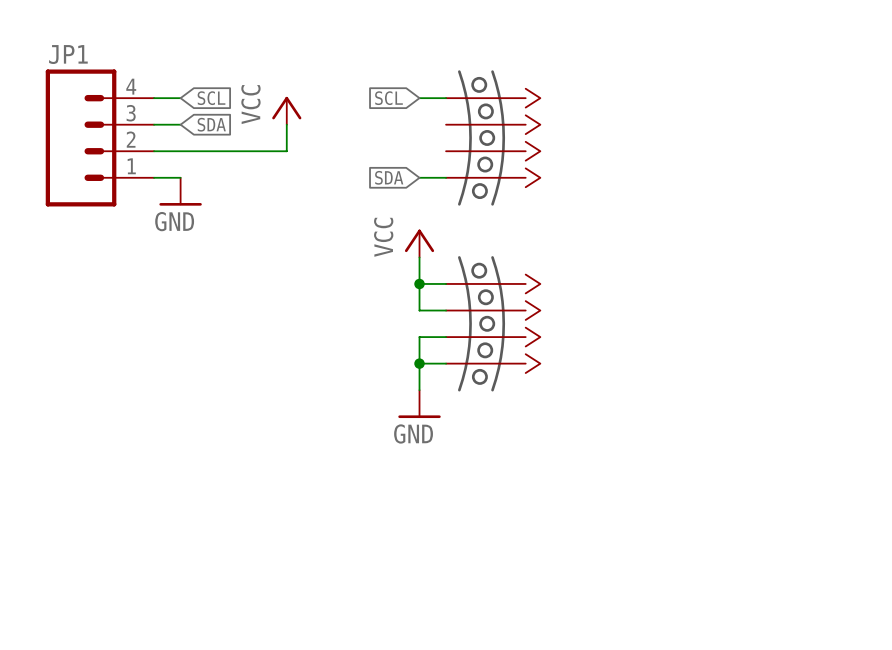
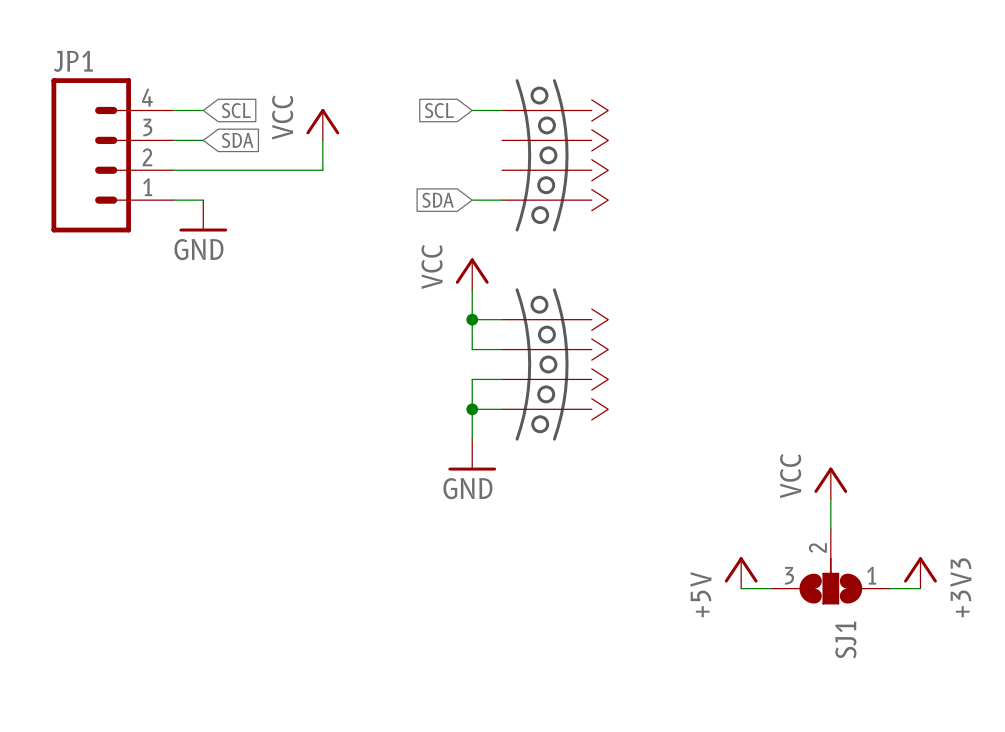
power symbol: none -> VCC (830, 483)
wire: none -> (830, 498) (830, 528)
SJ1: none -> (830, 566)
power symbol: none -> +5V (741, 572)
power symbol: none -> +3V3 (920, 572)
wire: none -> (741, 588) (771, 588)
wire: none -> (890, 588) (920, 588)

